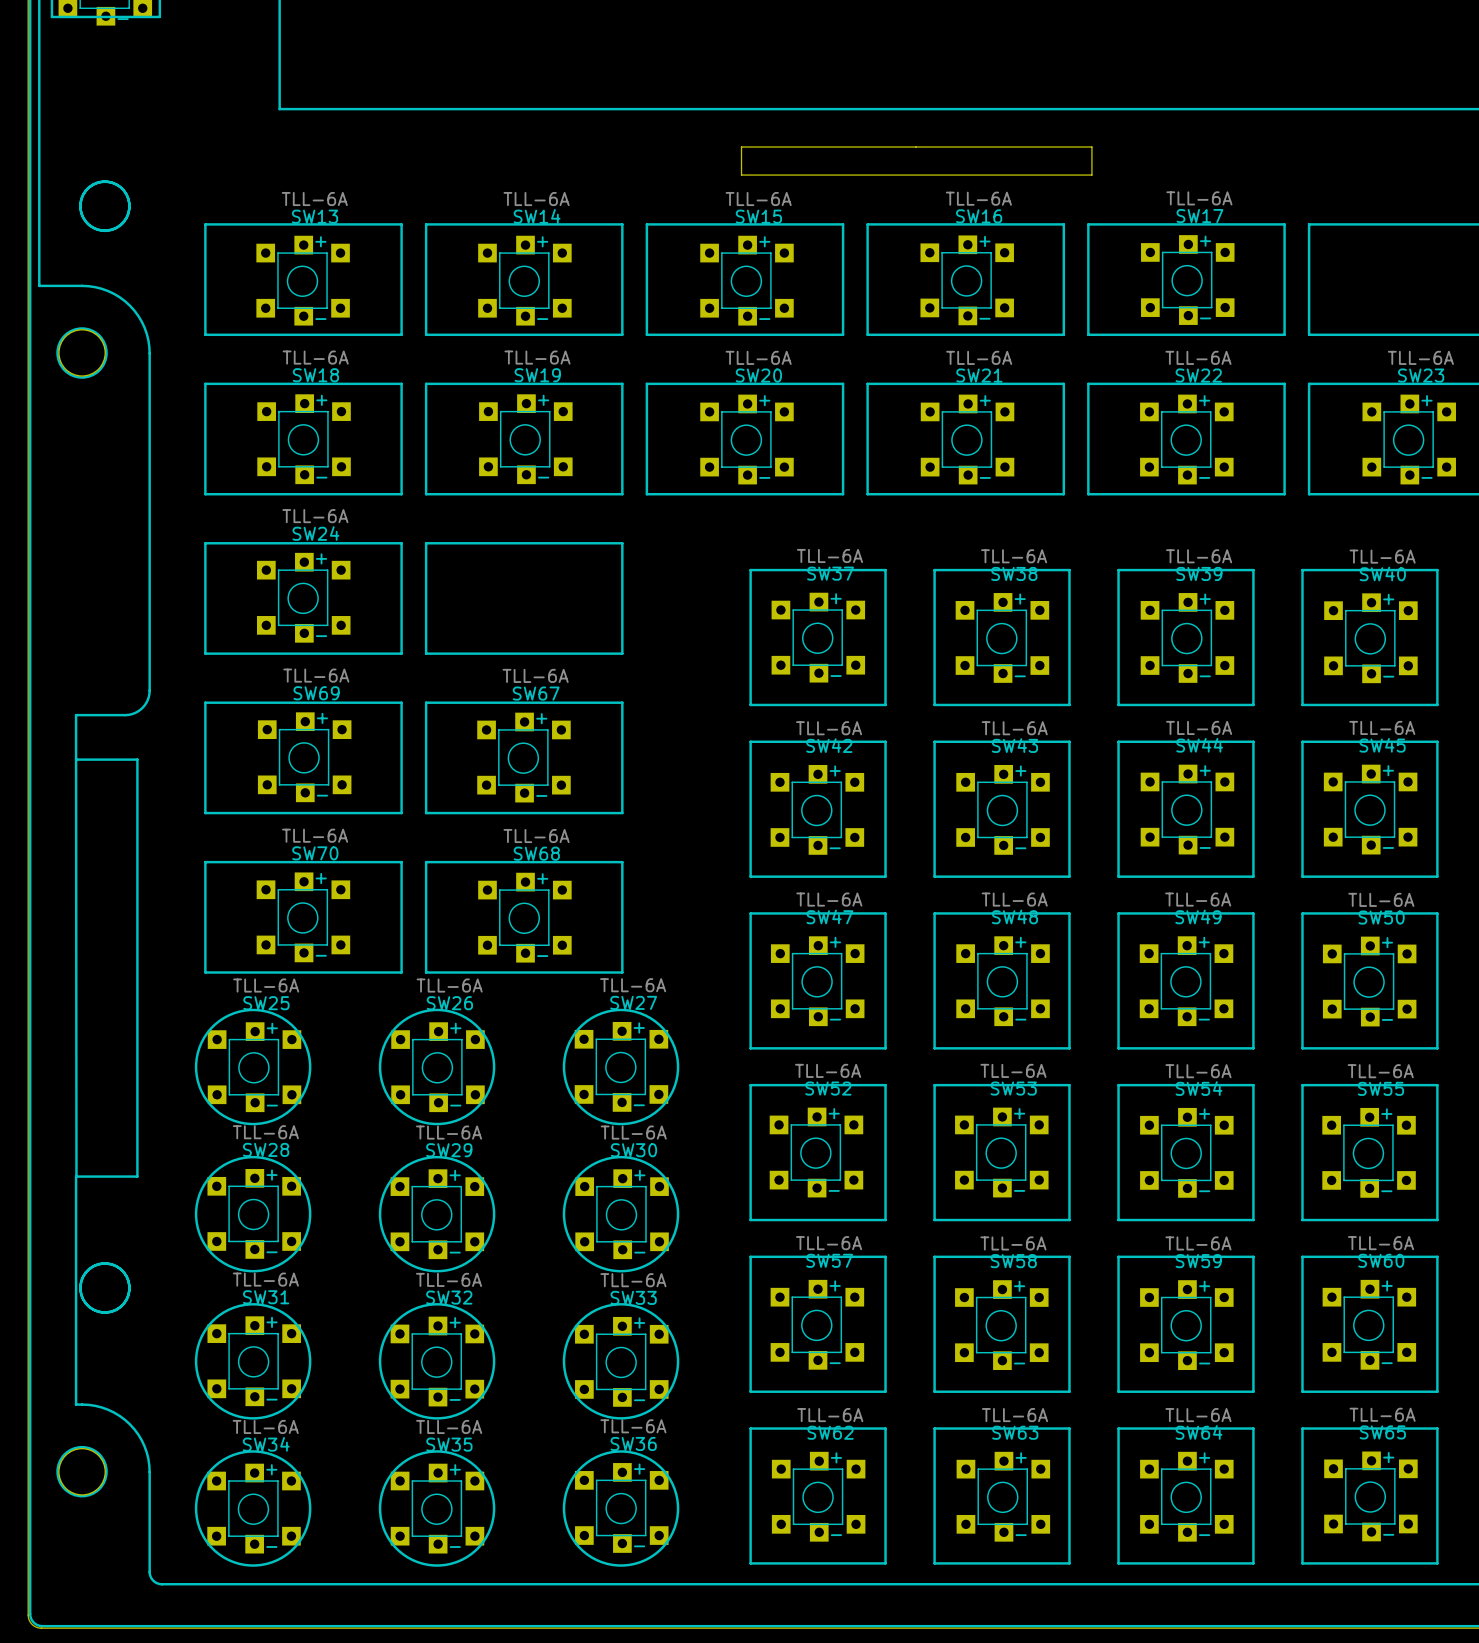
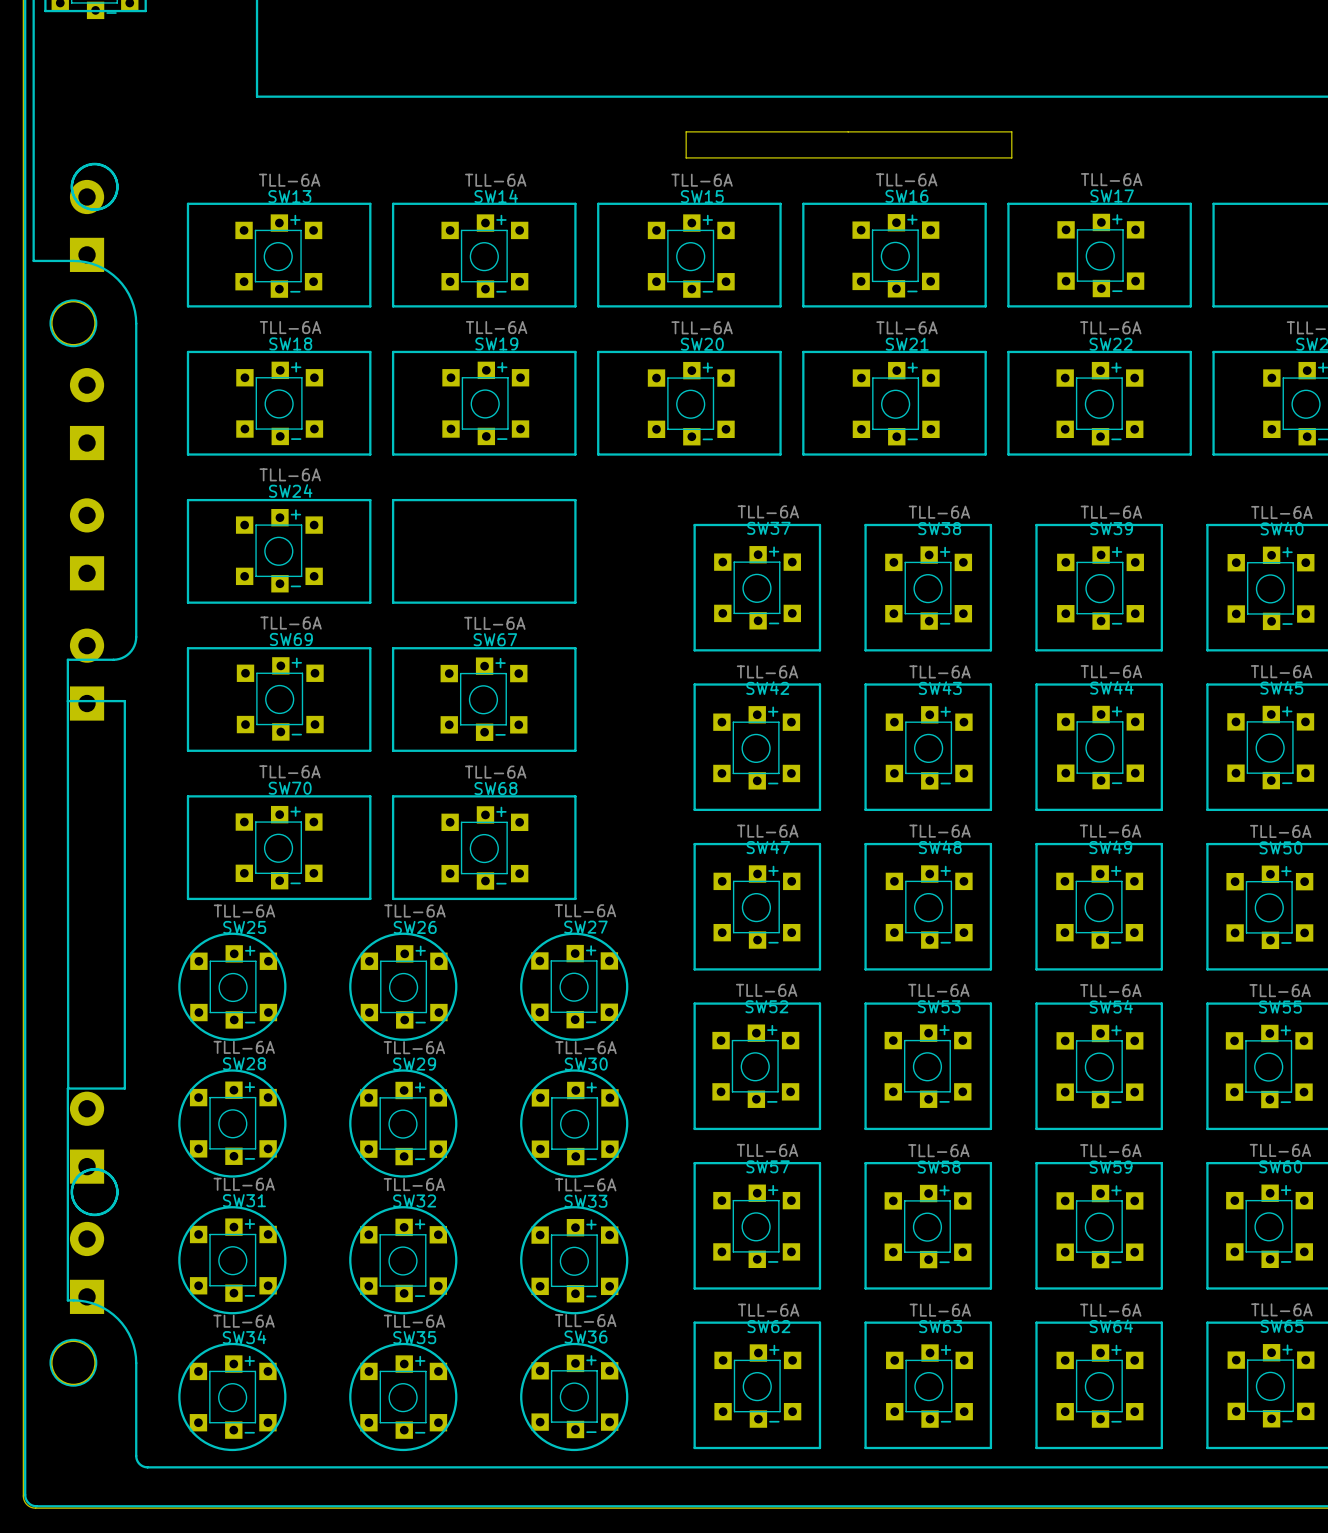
part: none -> (87, 225)
part: none -> (87, 414)
part: none -> (87, 544)
part: none -> (87, 674)
part: none -> (87, 1137)
part: none -> (87, 1267)

